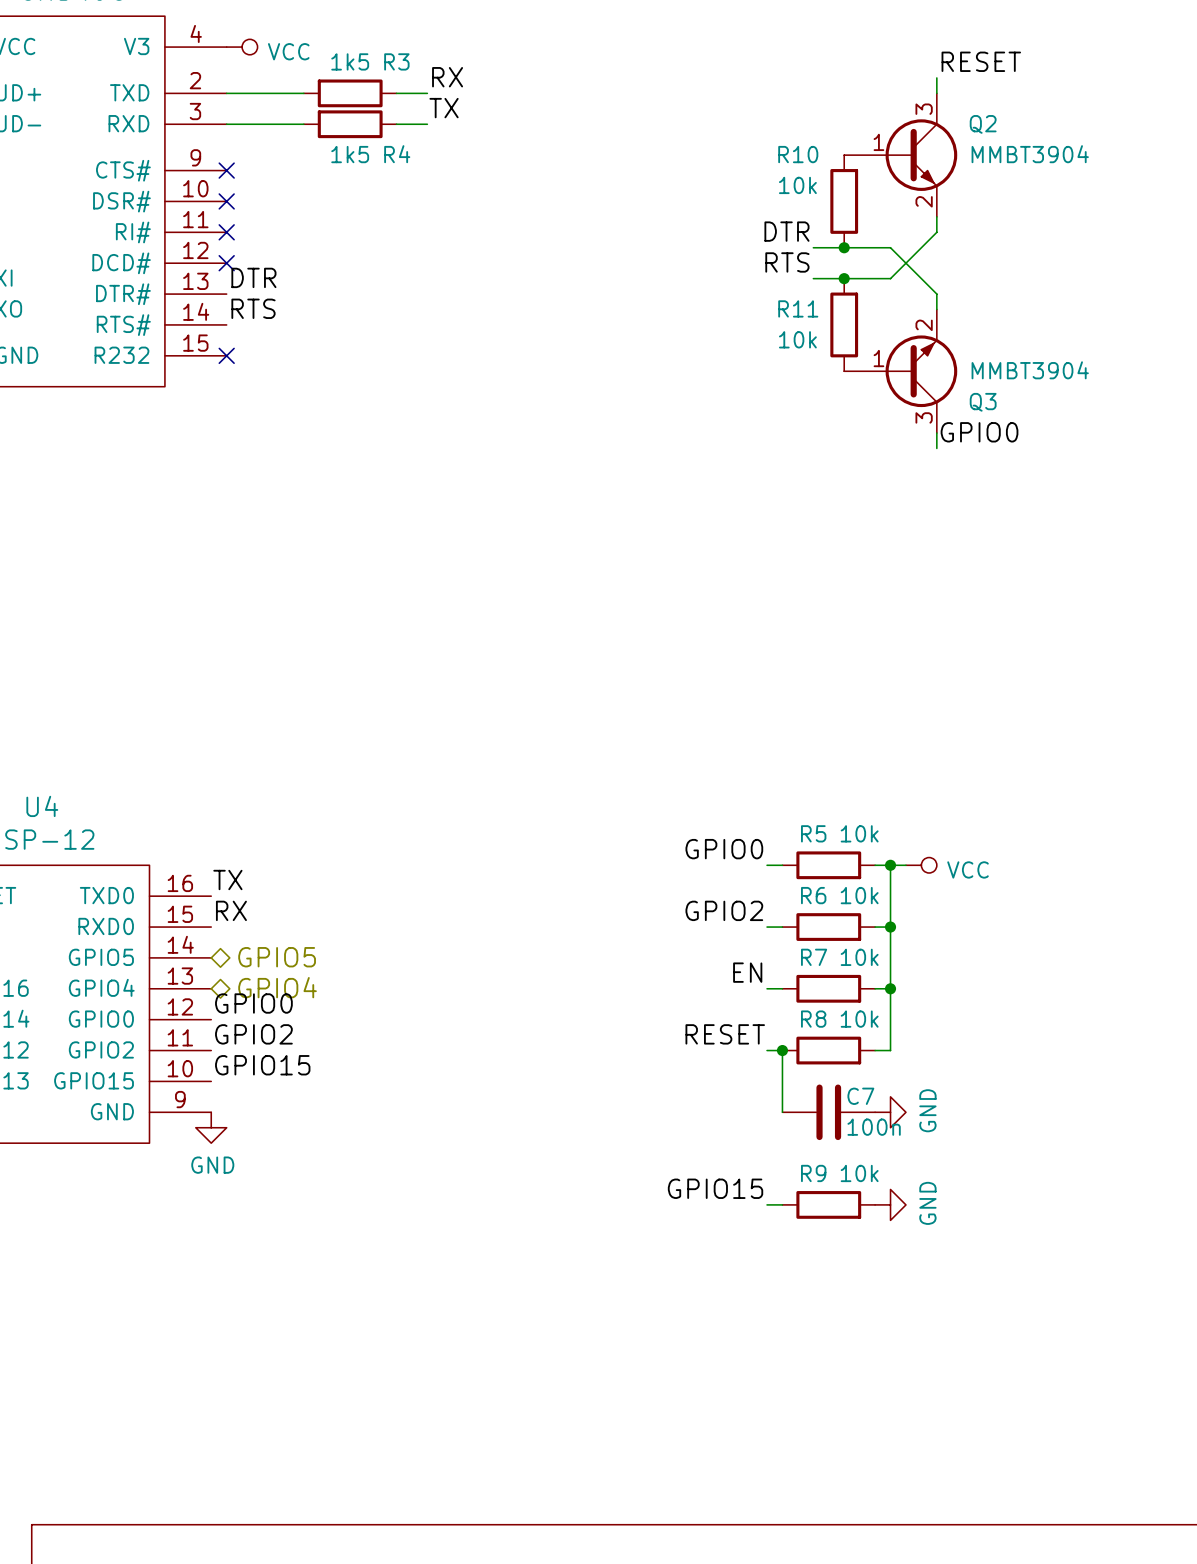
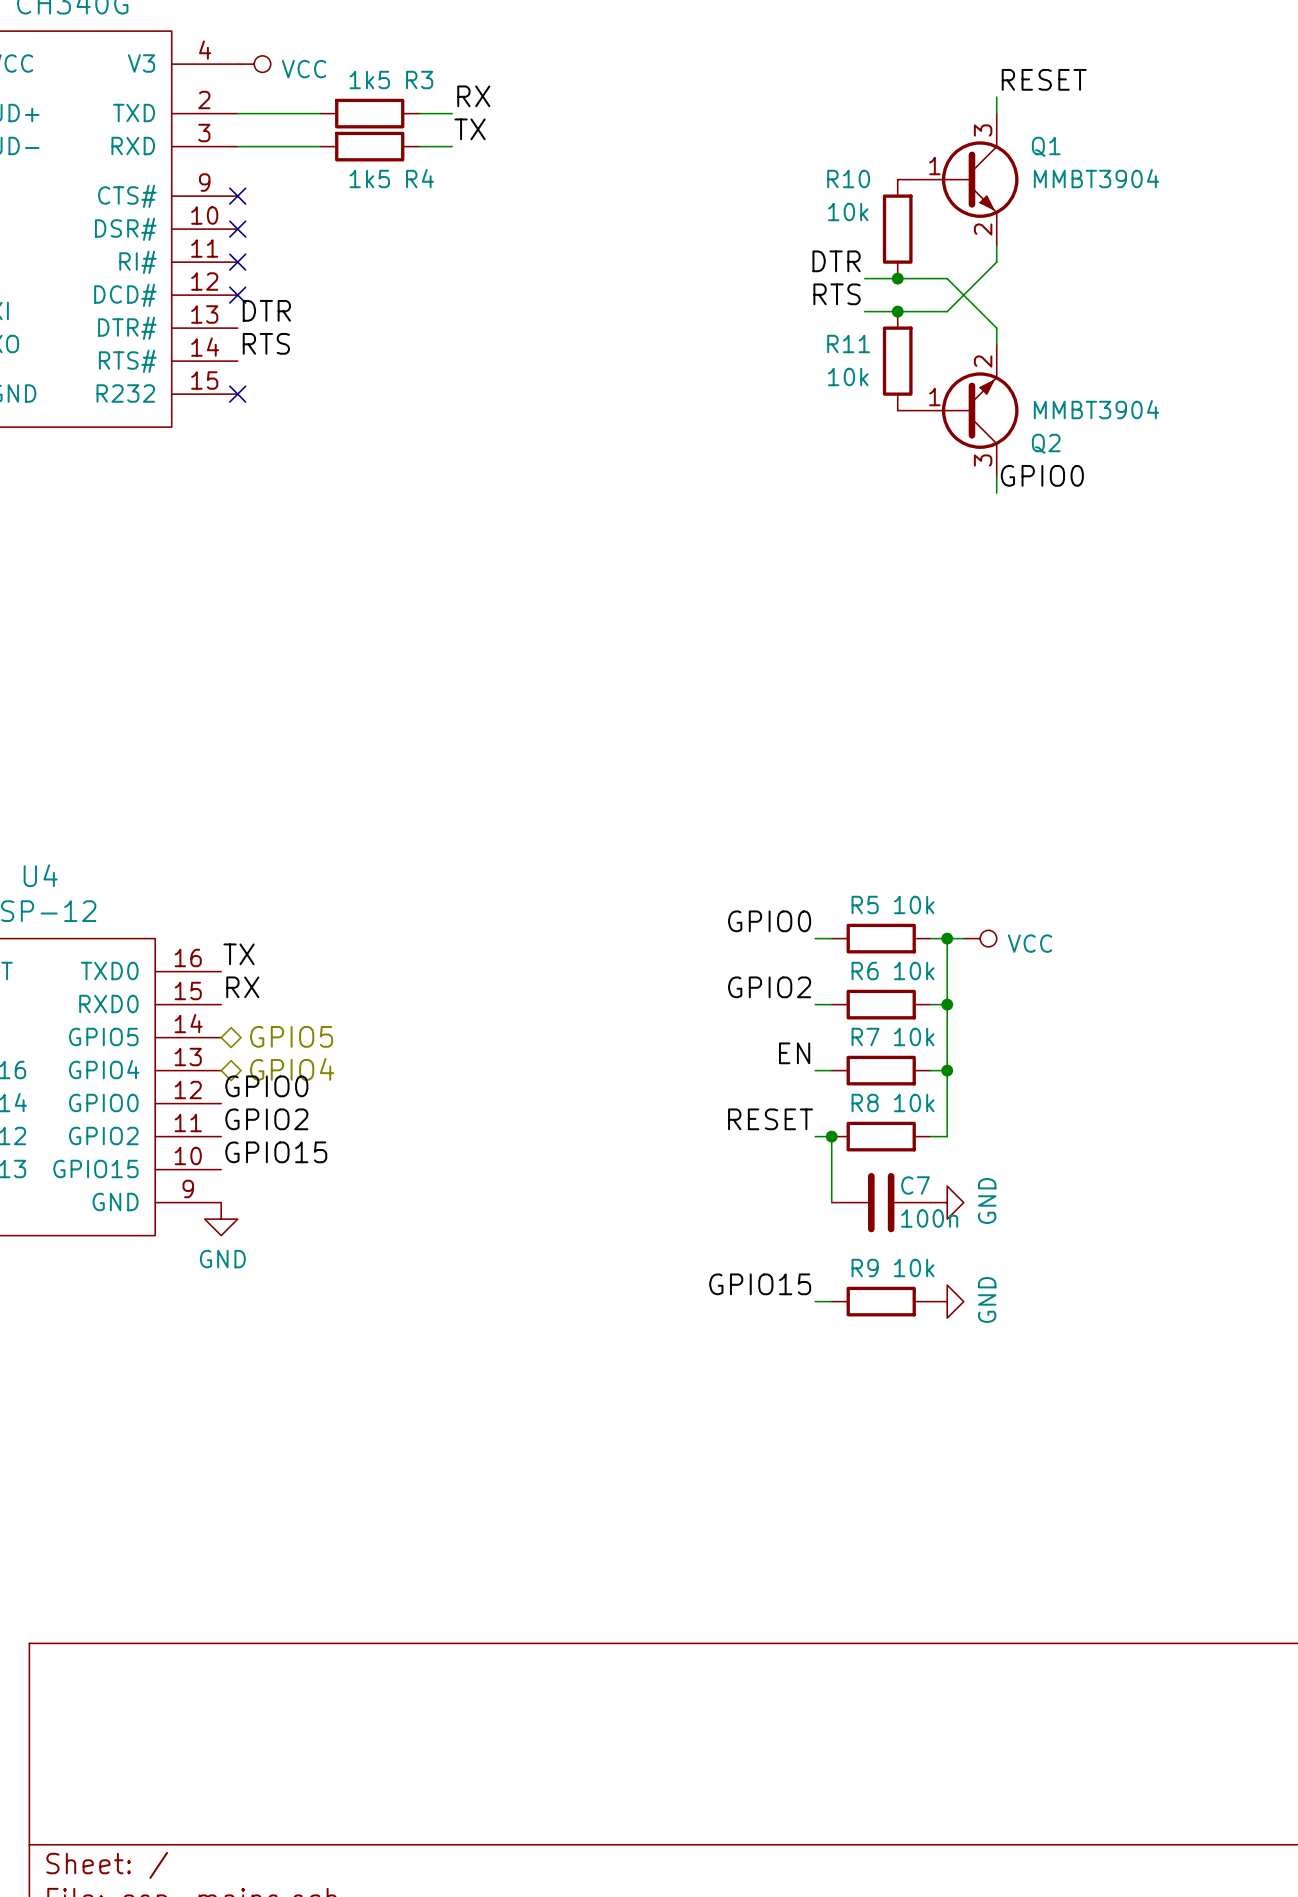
Q2 name: Q2 (983, 124) -> Q1 (1046, 146)
Q3 name: Q3 (983, 402) -> Q2 (1046, 443)

